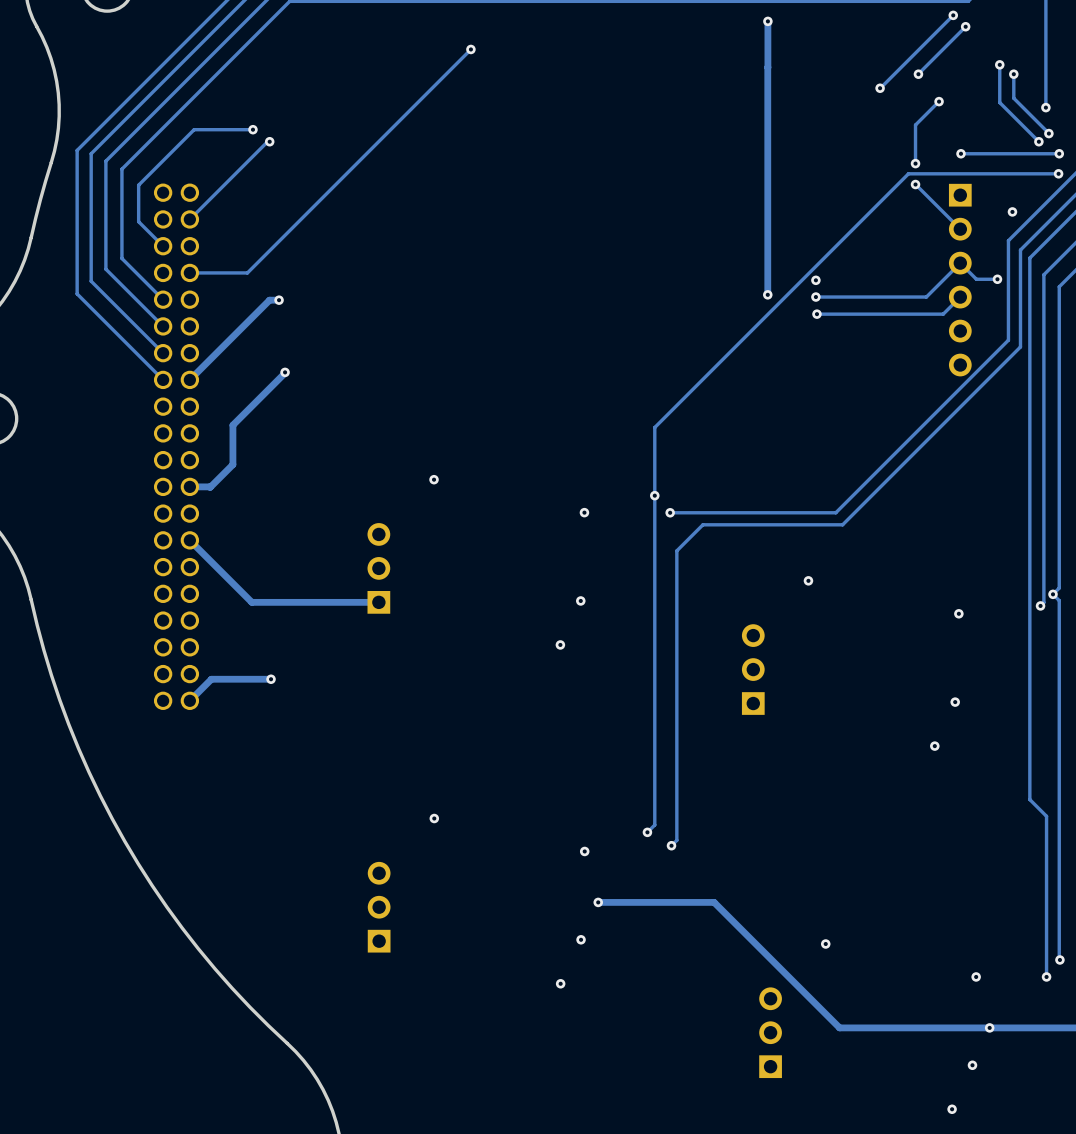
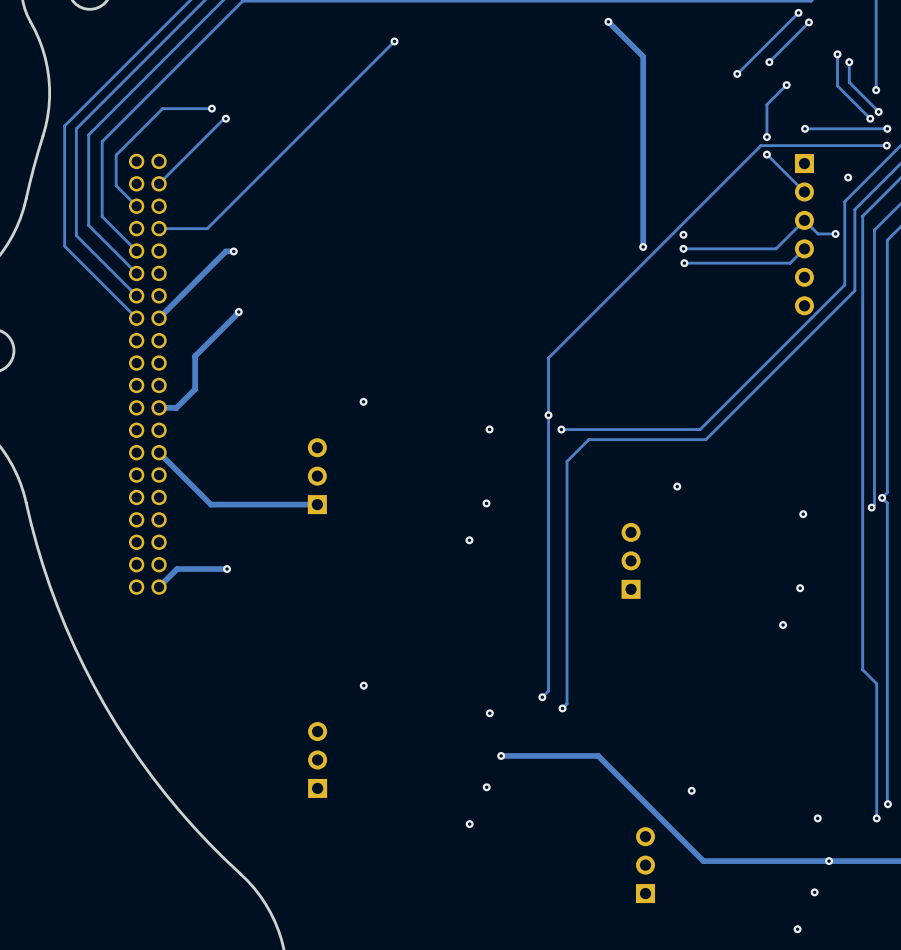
track: (767, 21) (767, 67) -> (608, 21) (643, 56)
via position: (767, 21) -> (608, 21)

